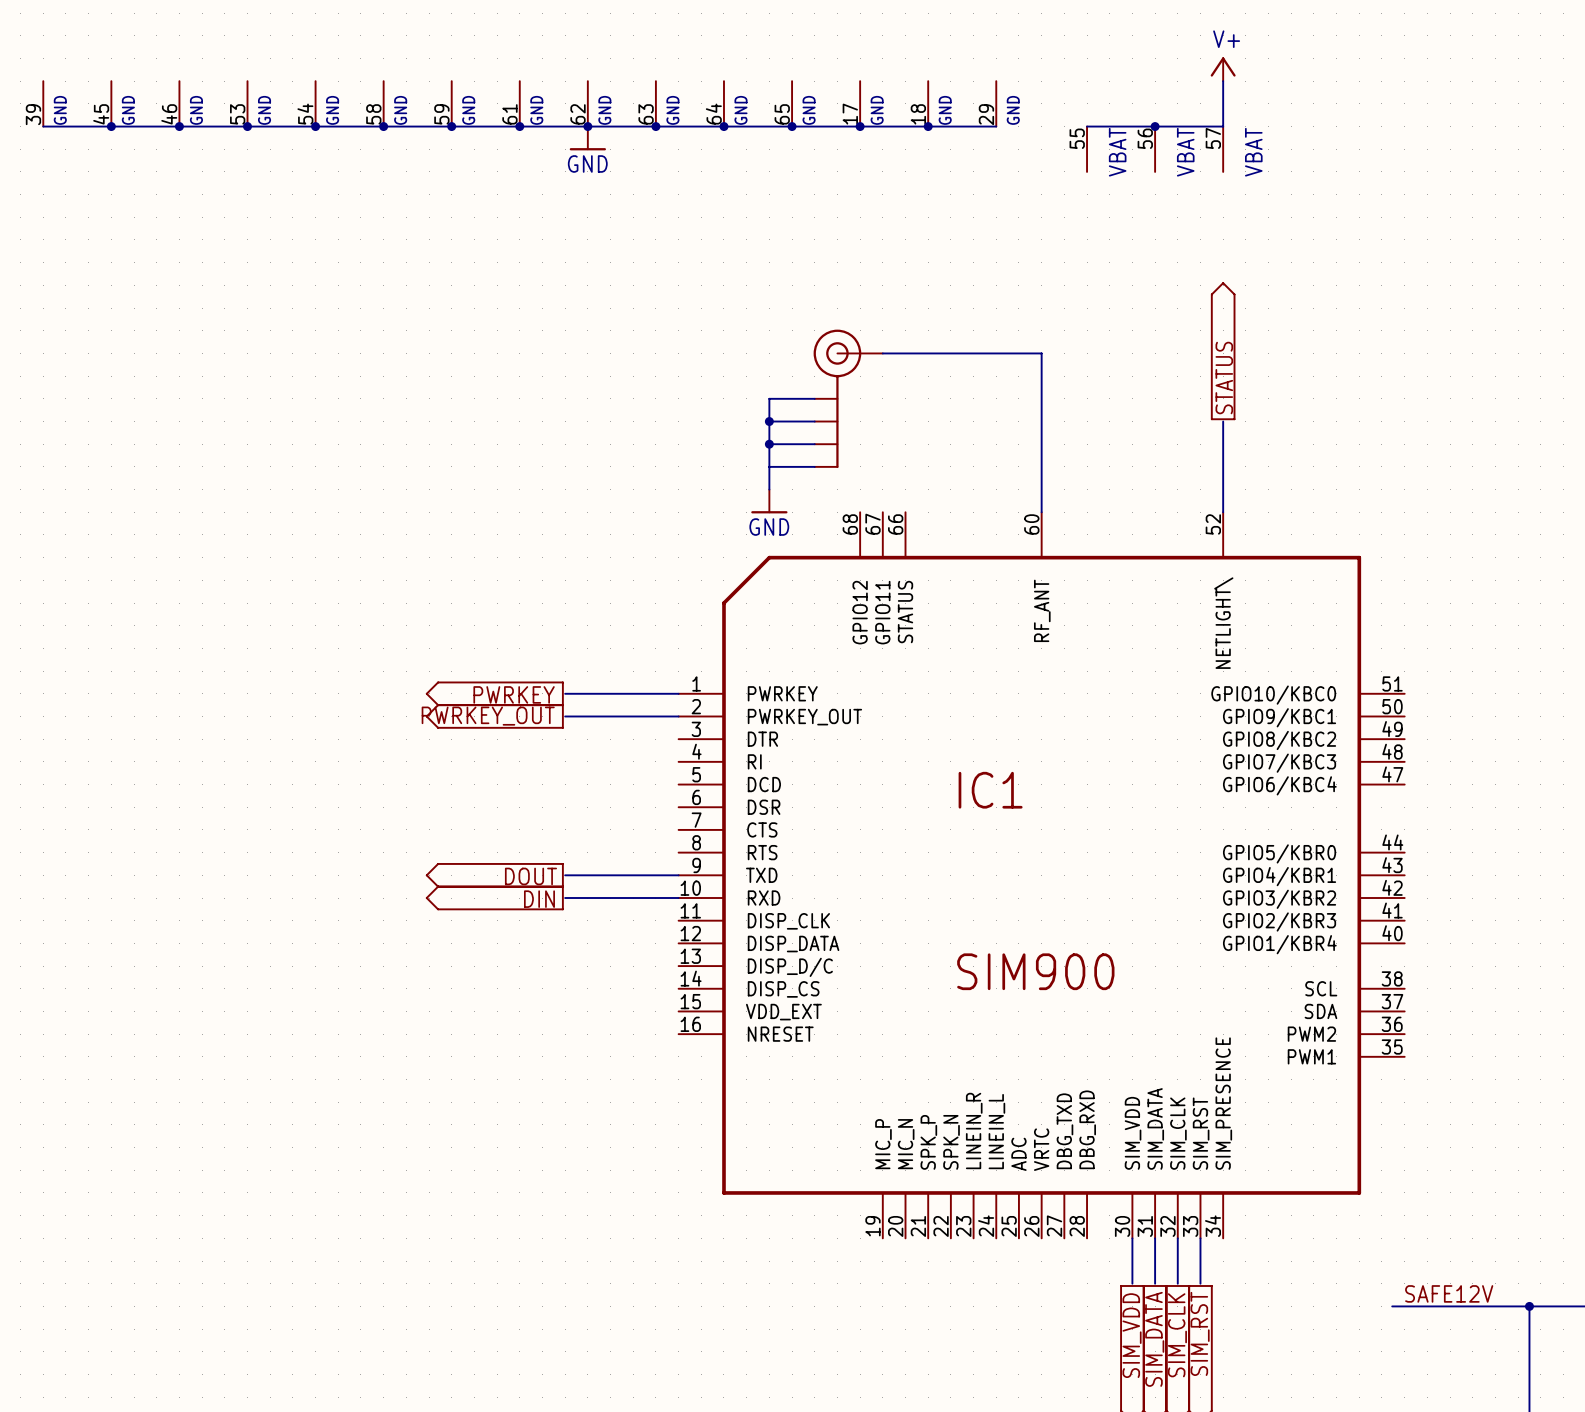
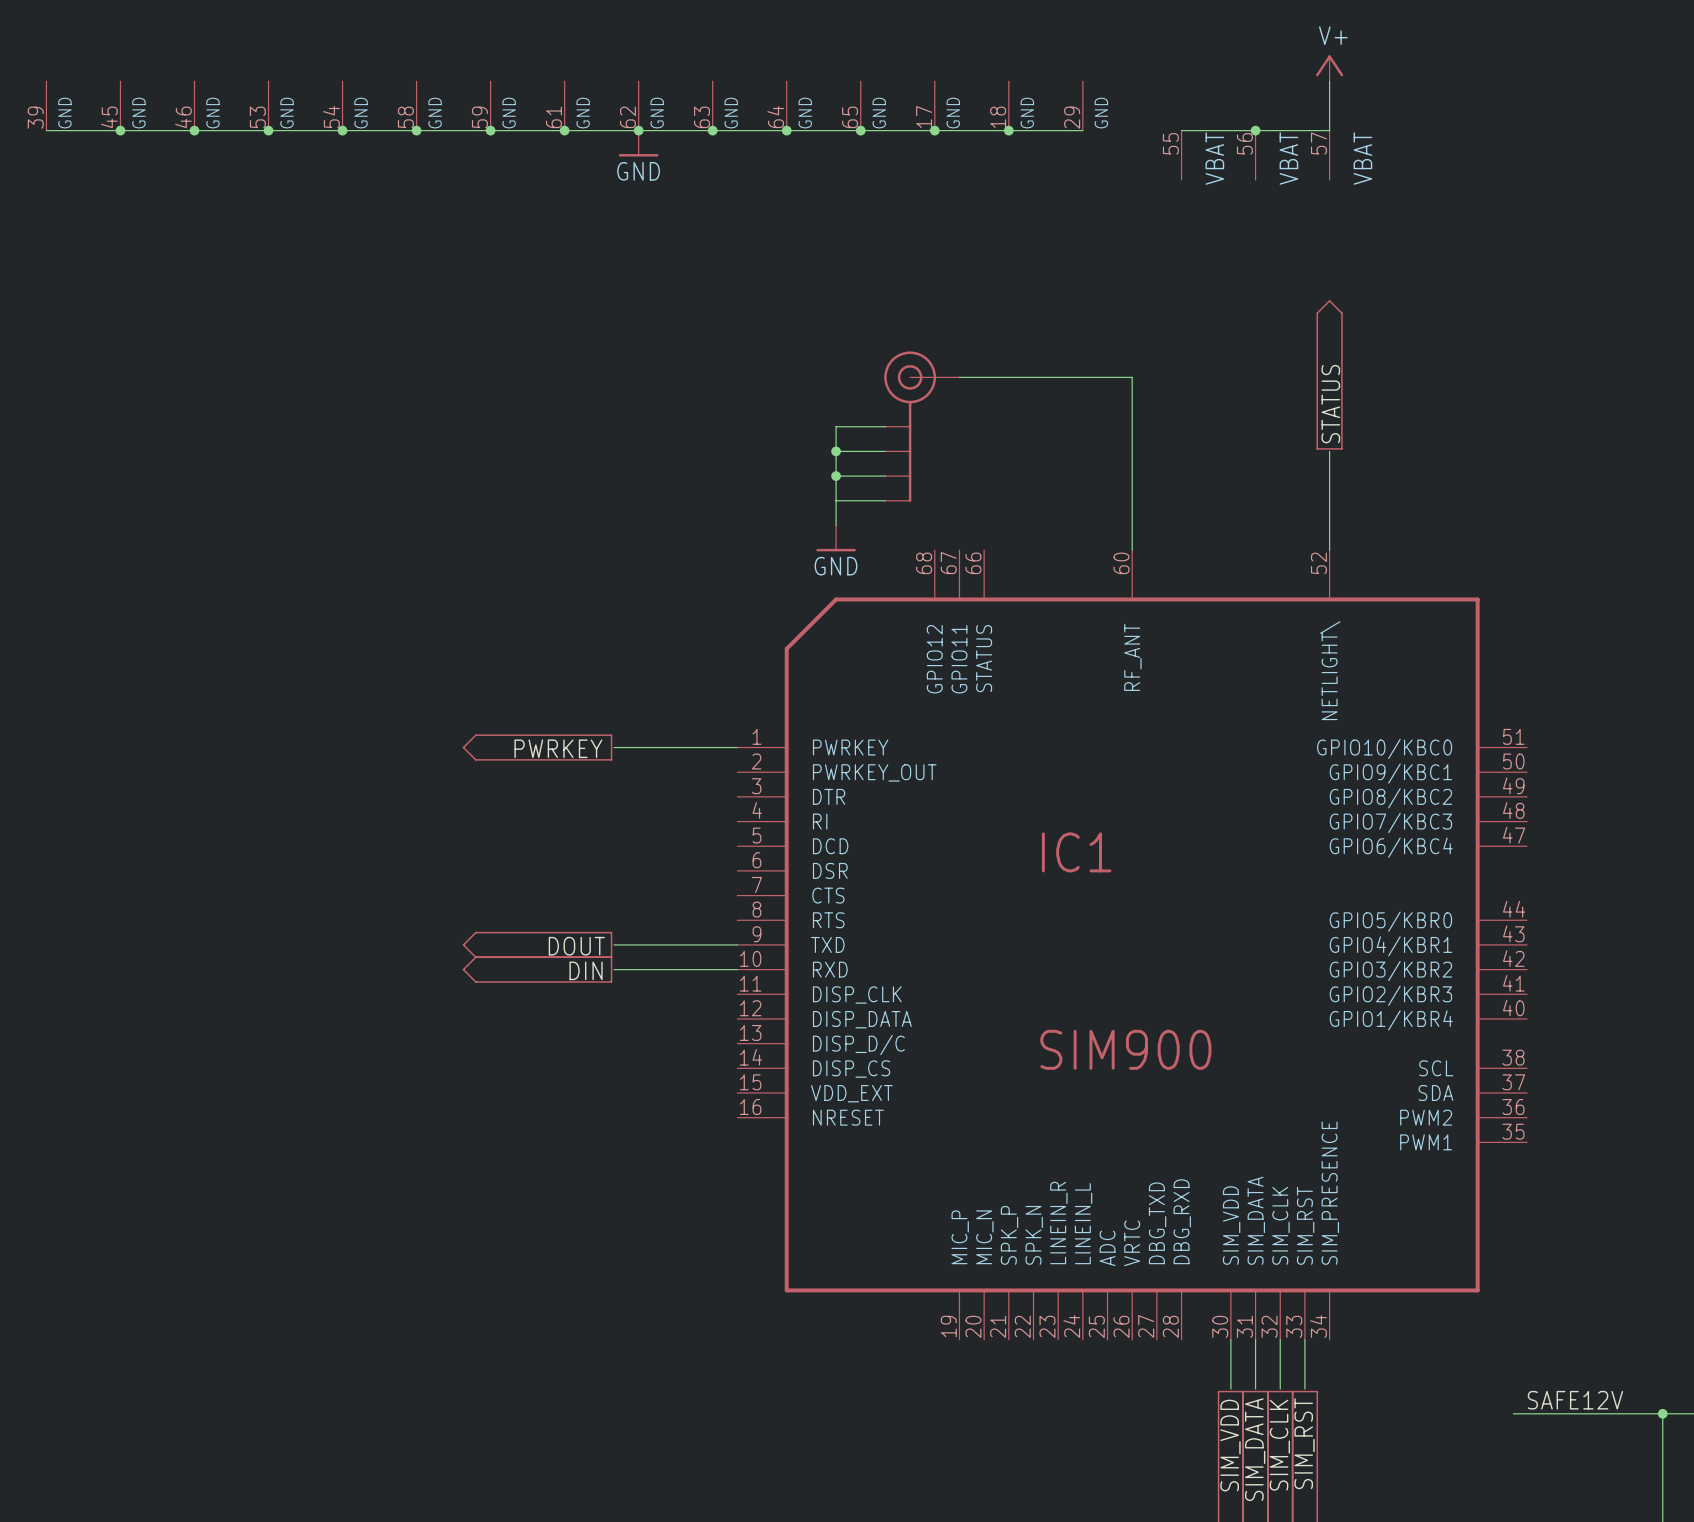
label: PWRKEY_OUT (488, 716) -> none
part: (494, 716) -> none
wire: (565, 716) (678, 716) -> none

